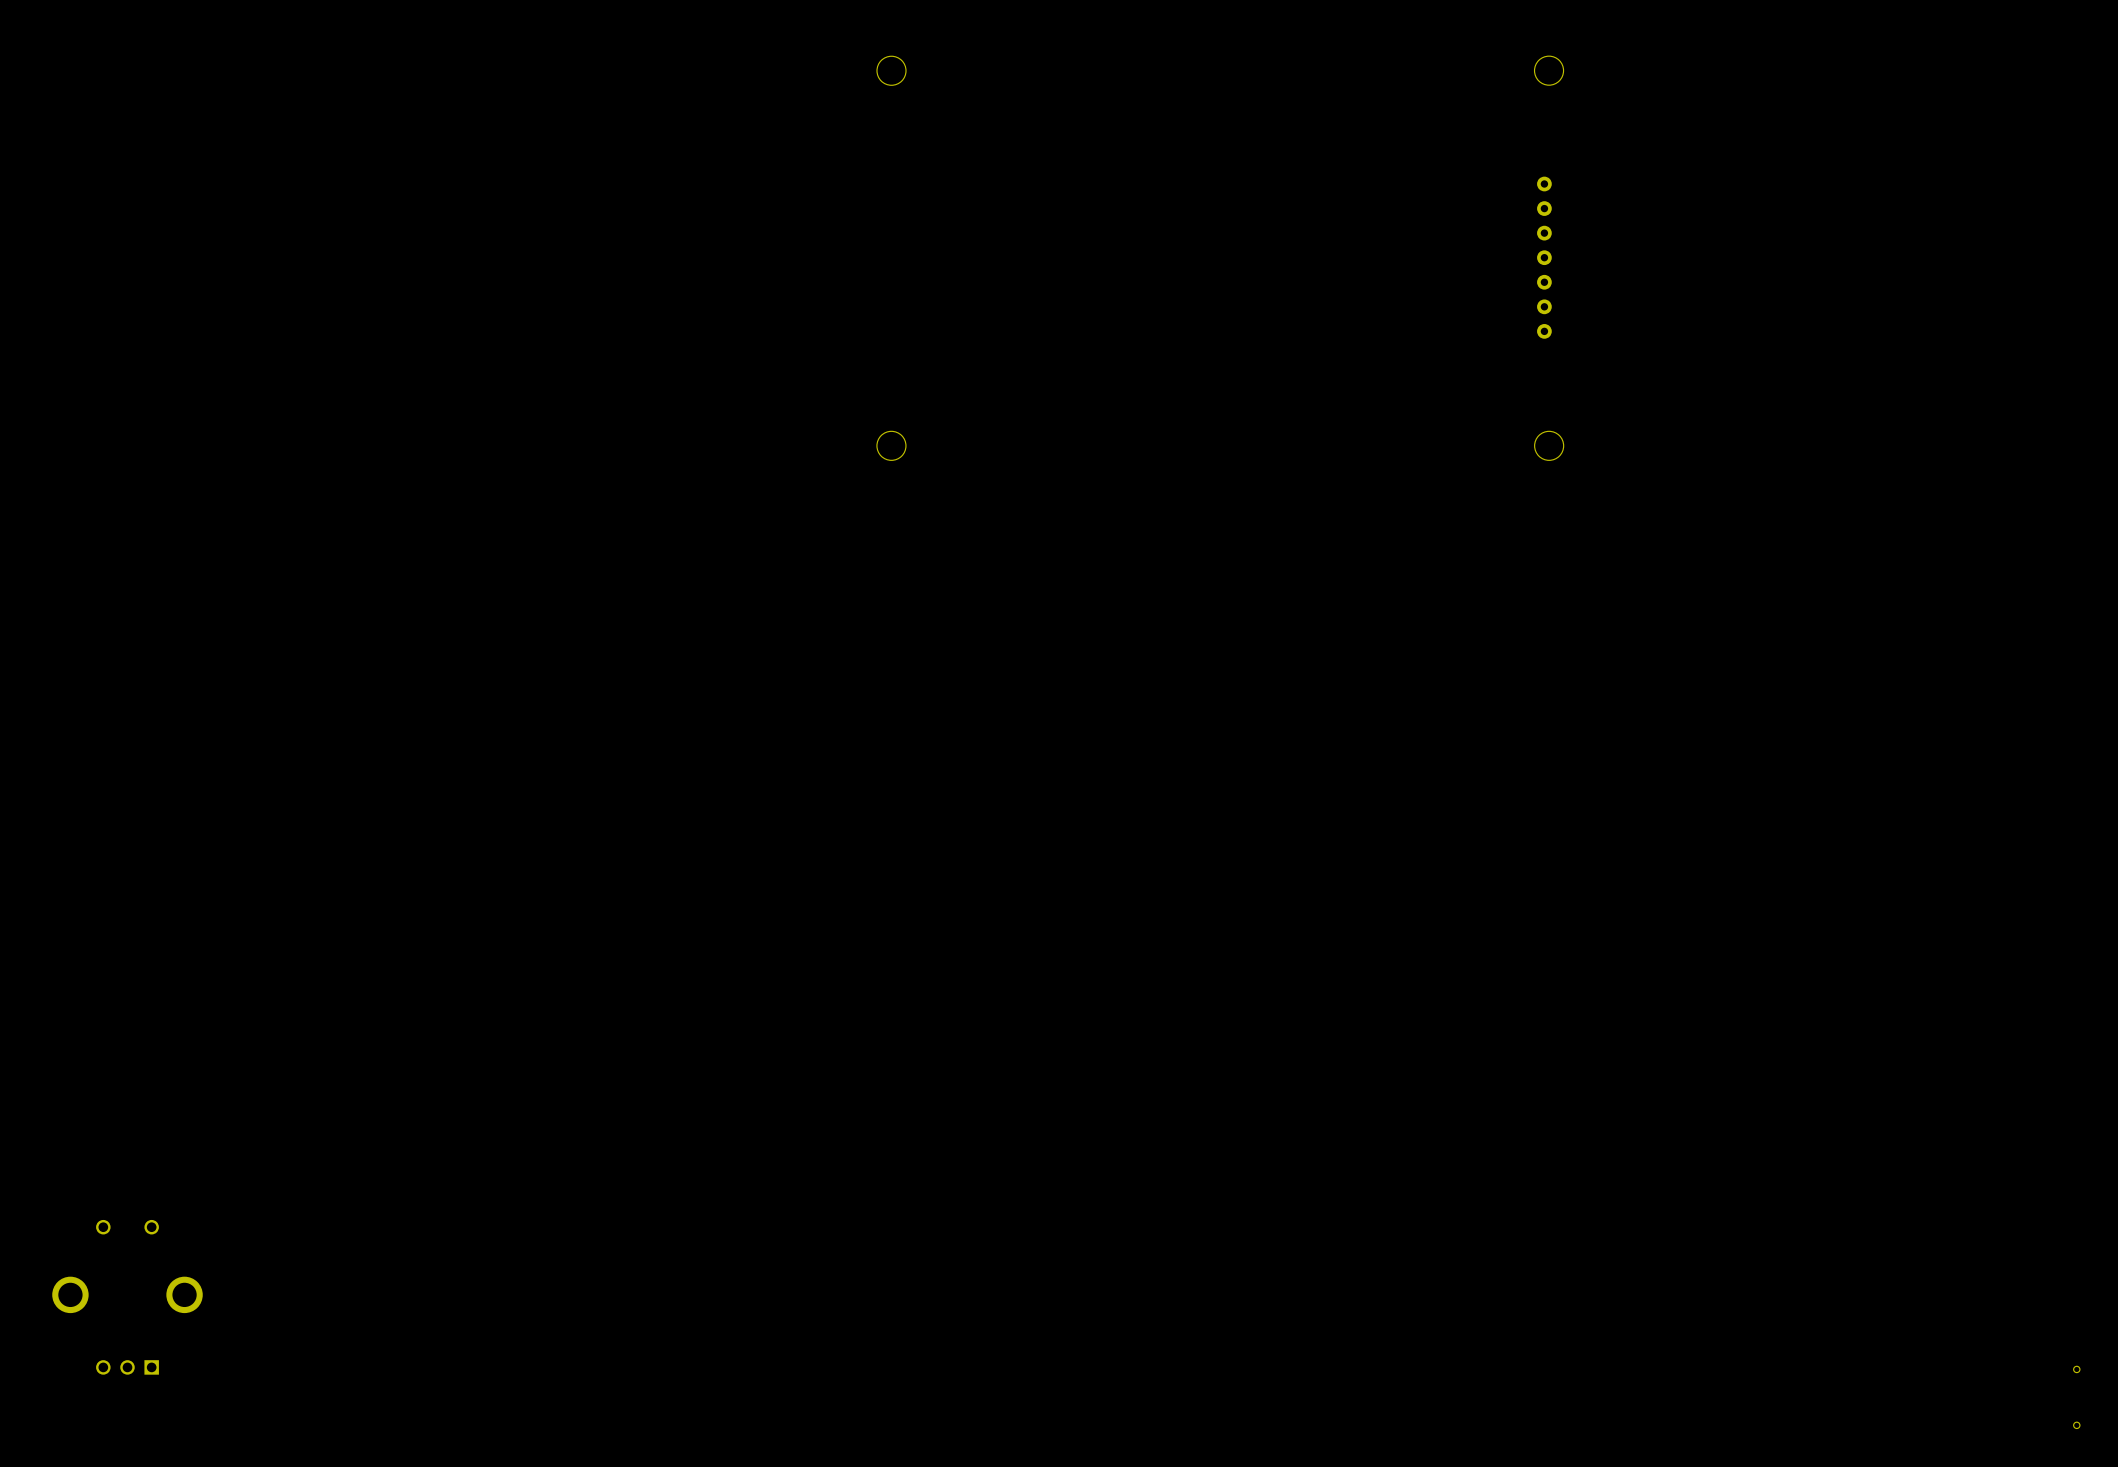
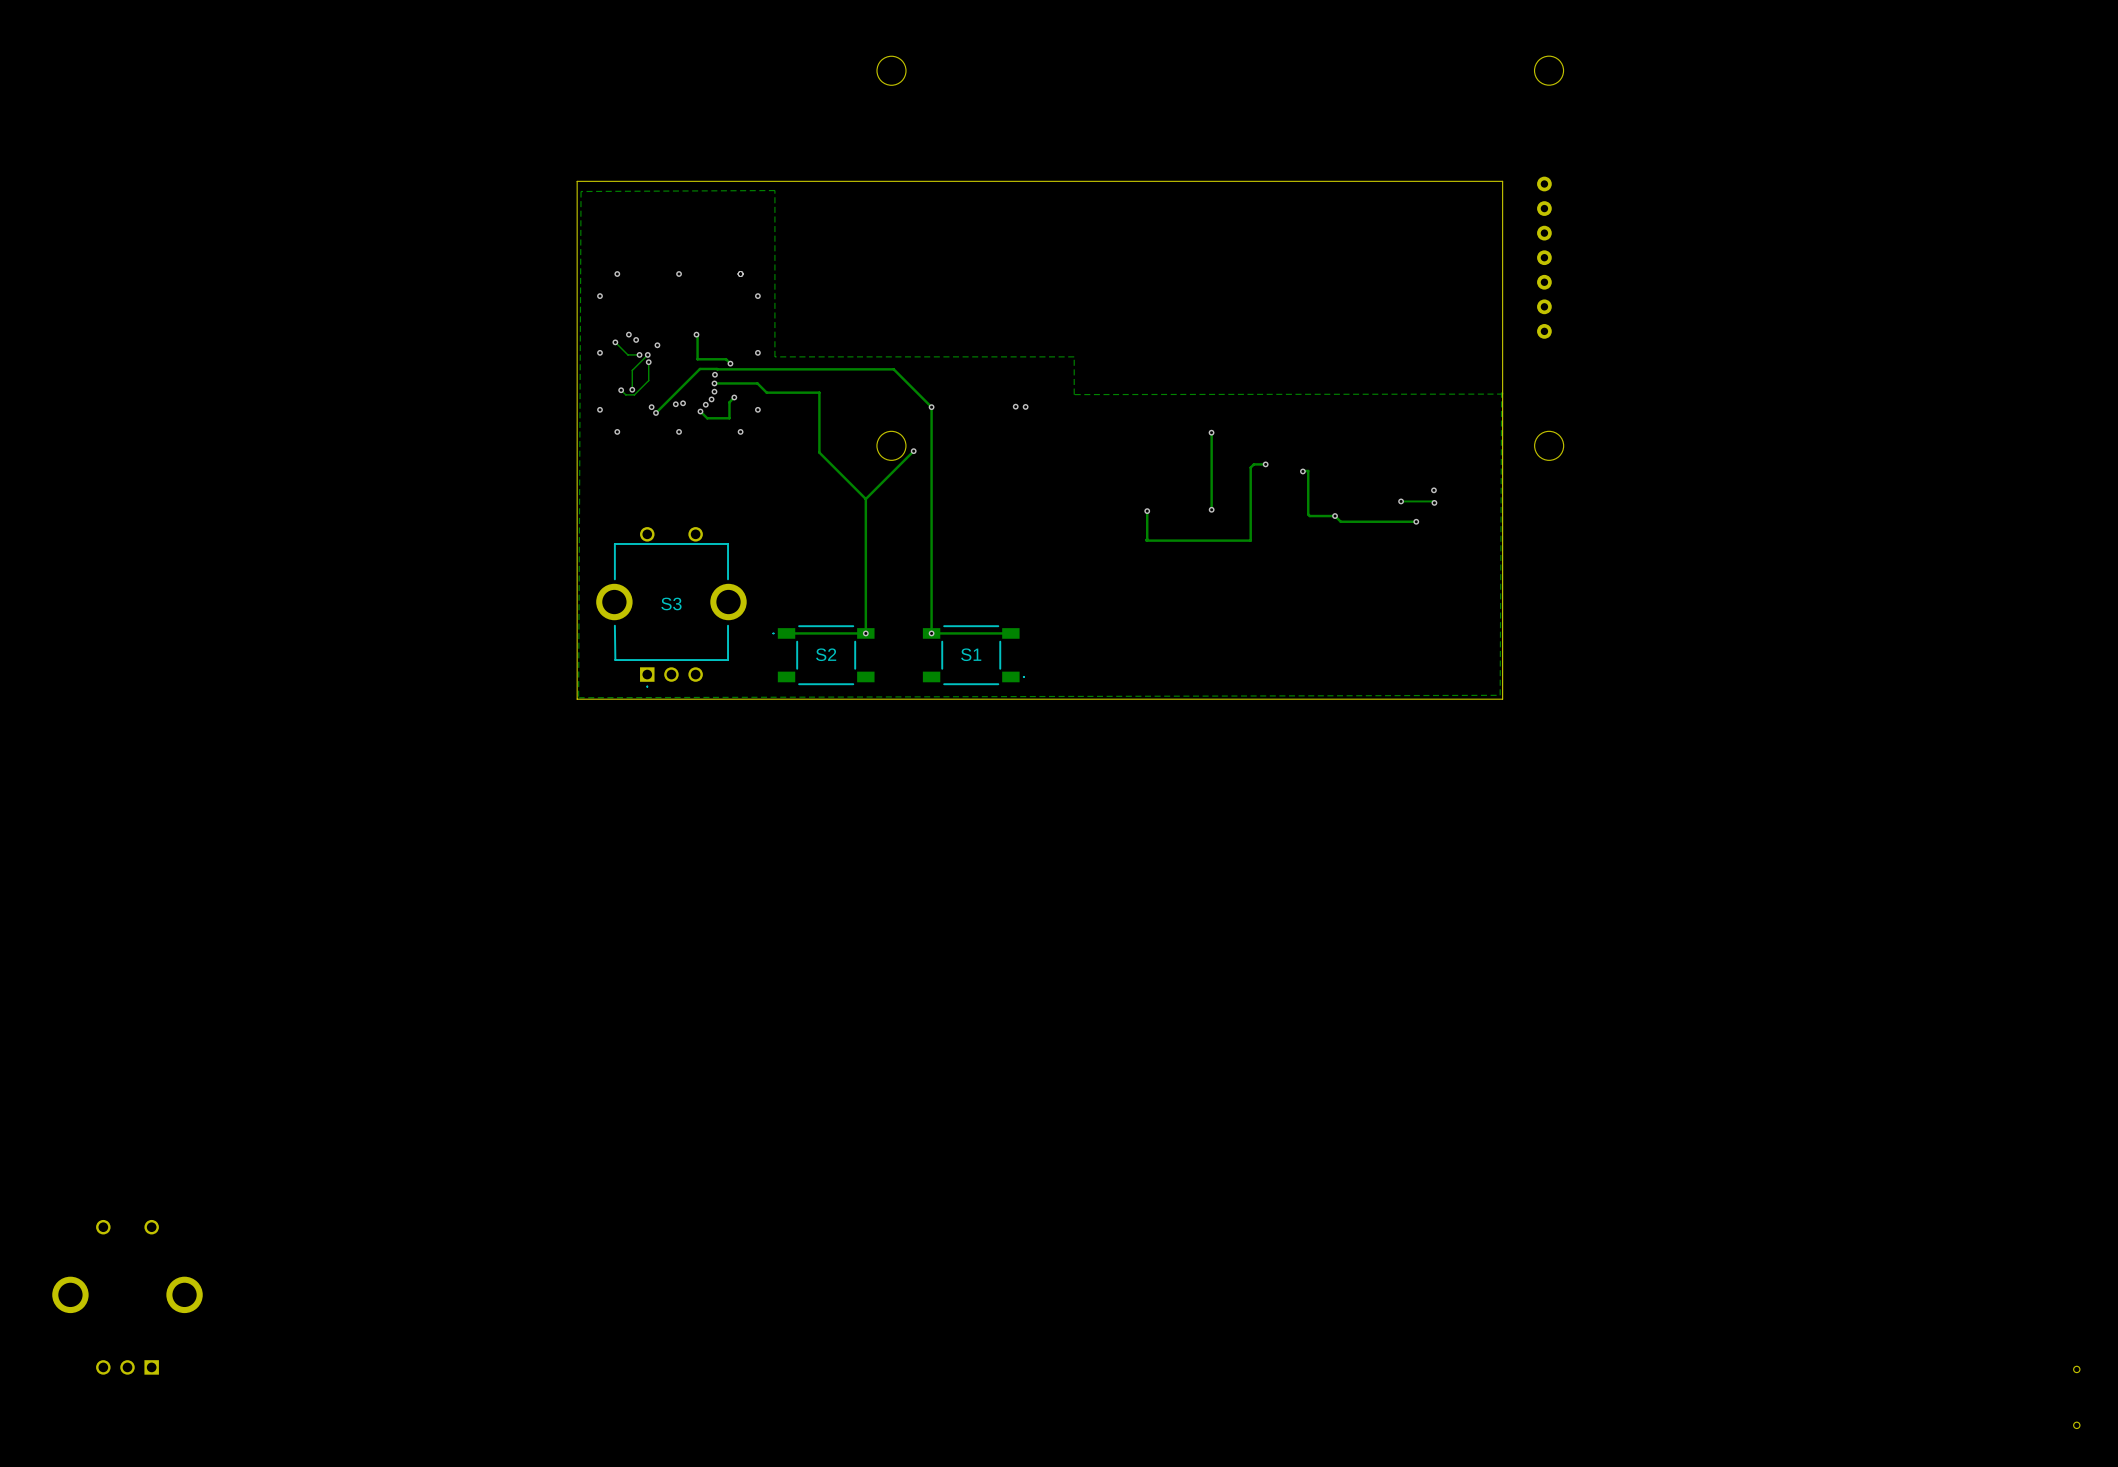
board edge: none -> (1502, 181) (577, 181) (577, 699) (1502, 699) (1502, 181)
zone outline: none -> (774, 190) (774, 356) (1074, 356) (1074, 394) (1503, 394) (1501, 392) (1500, 695) (578, 697) (581, 191) (774, 190)
via: none -> (617, 274)
via: none -> (679, 274)
via: none -> (740, 274)
via: none -> (599, 296)
via: none -> (757, 296)
via: none -> (628, 334)
track: none -> (696, 334) (697, 359) (726, 359) (730, 363)
via: none -> (696, 334)
via: none -> (636, 339)
track: none -> (615, 342) (627, 354) (639, 354)
via: none -> (615, 342)
via: none -> (657, 345)
via: none -> (599, 352)
via: none -> (757, 352)
via: none -> (639, 354)
track: none -> (647, 354) (632, 370) (632, 389)
via: none -> (647, 354)
track: none -> (648, 362) (648, 380) (634, 394) (625, 394) (621, 390)
via: none -> (648, 362)
via: none -> (730, 363)
via: none -> (714, 374)
track: none -> (714, 383) (757, 383) (766, 392) (819, 392) (819, 452) (865, 499)
via: none -> (714, 383)
via: none -> (632, 389)
via: none -> (621, 390)
via: none -> (714, 391)
track: none -> (734, 397) (729, 402) (729, 418) (707, 418) (700, 411)
via: none -> (734, 397)
via: none -> (711, 399)
via: none -> (683, 403)
via: none -> (675, 404)
via: none -> (705, 404)
via: none -> (1015, 406)
via: none -> (1025, 406)
via: none -> (651, 407)
via: none -> (931, 407)
via: none -> (599, 409)
via: none -> (757, 409)
via: none -> (700, 411)
track: none -> (655, 412) (699, 368) (893, 369) (931, 407) (931, 633) (1010, 633)
via: none -> (655, 412)
via: none -> (617, 431)
via: none -> (679, 431)
via: none -> (740, 431)
track: none -> (1211, 432) (1211, 509)
via: none -> (1211, 432)
track: none -> (913, 451) (865, 499)
via: none -> (913, 451)
track: none -> (1265, 464) (1253, 464) (1250, 467) (1250, 540) (1146, 540) (1147, 511)
via: none -> (1265, 464)
track: none -> (1302, 471) (1308, 470) (1309, 516) (1335, 516) (1340, 521) (1416, 521)
via: none -> (1302, 471)
via: none -> (1433, 490)
track: none -> (865, 499) (865, 633) (786, 633)
track: none -> (1401, 501) (1434, 502)
via: none -> (1401, 501)
via: none -> (1434, 502)
via: none -> (1211, 509)
via: none -> (1147, 511)
via: none -> (1335, 516)
via: none -> (1416, 521)
S3: none -> (671, 607)
via: none -> (865, 633)
via: none -> (931, 633)
S2: none -> (823, 655)
S1: none -> (973, 655)

